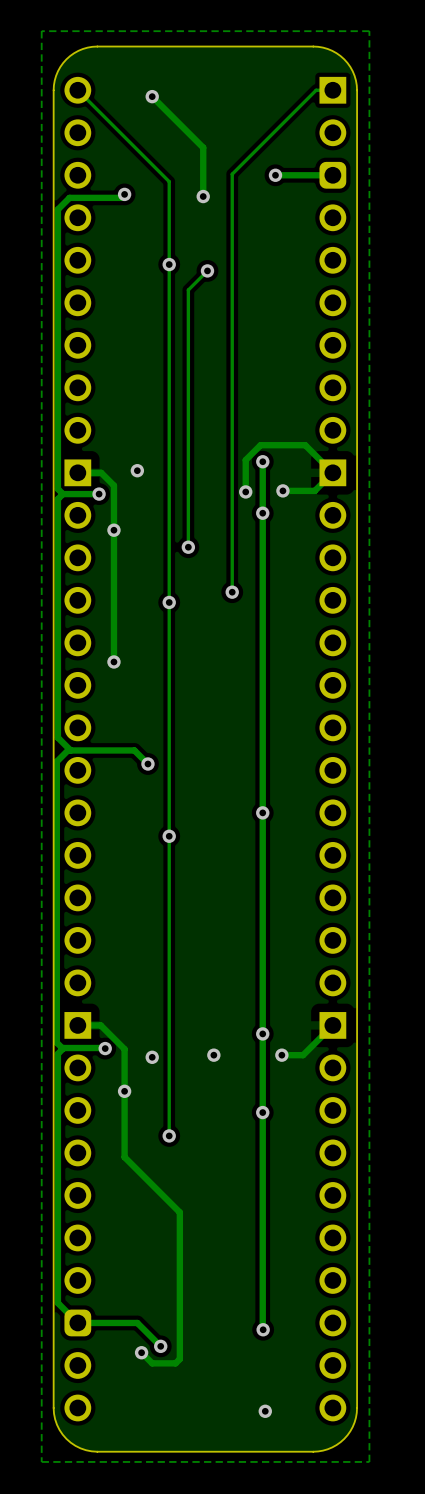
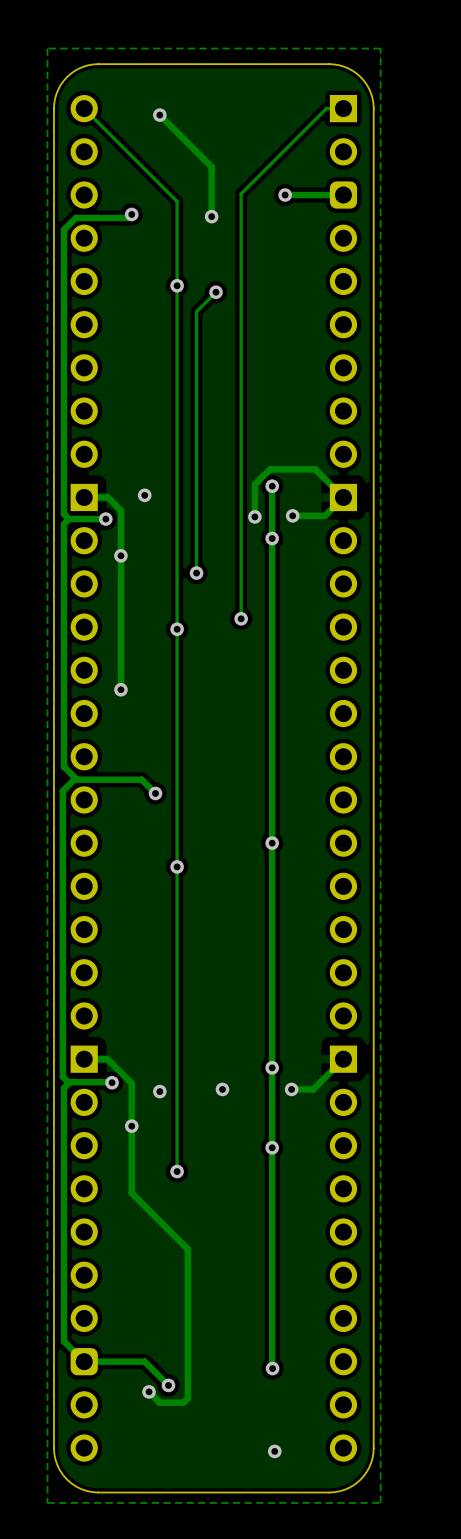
part footprint: [52, 45, 358, 1453] -> [53, 63, 375, 1494]

